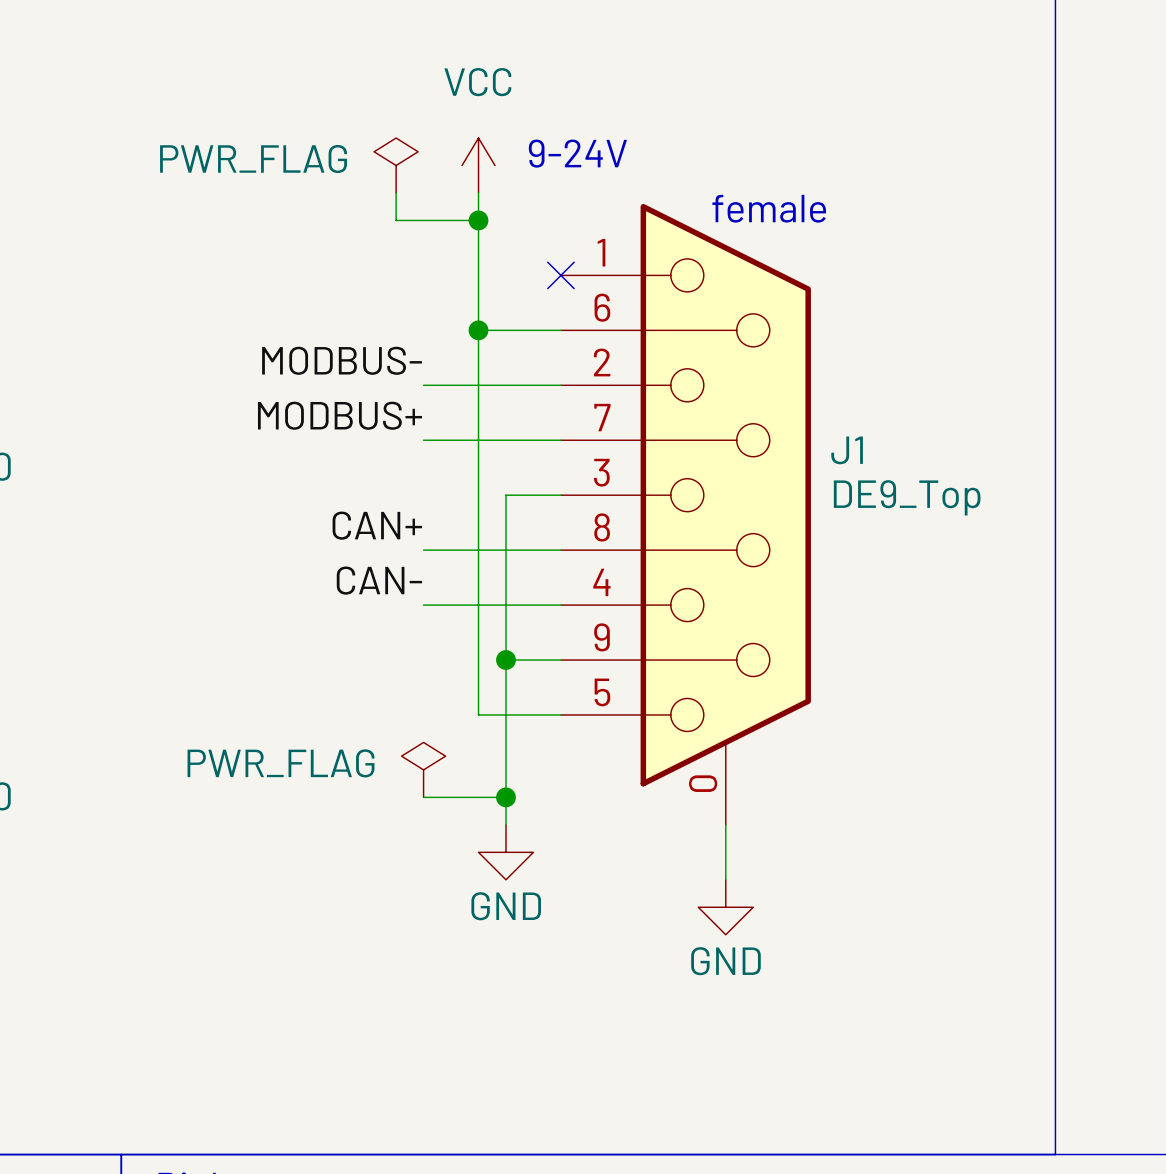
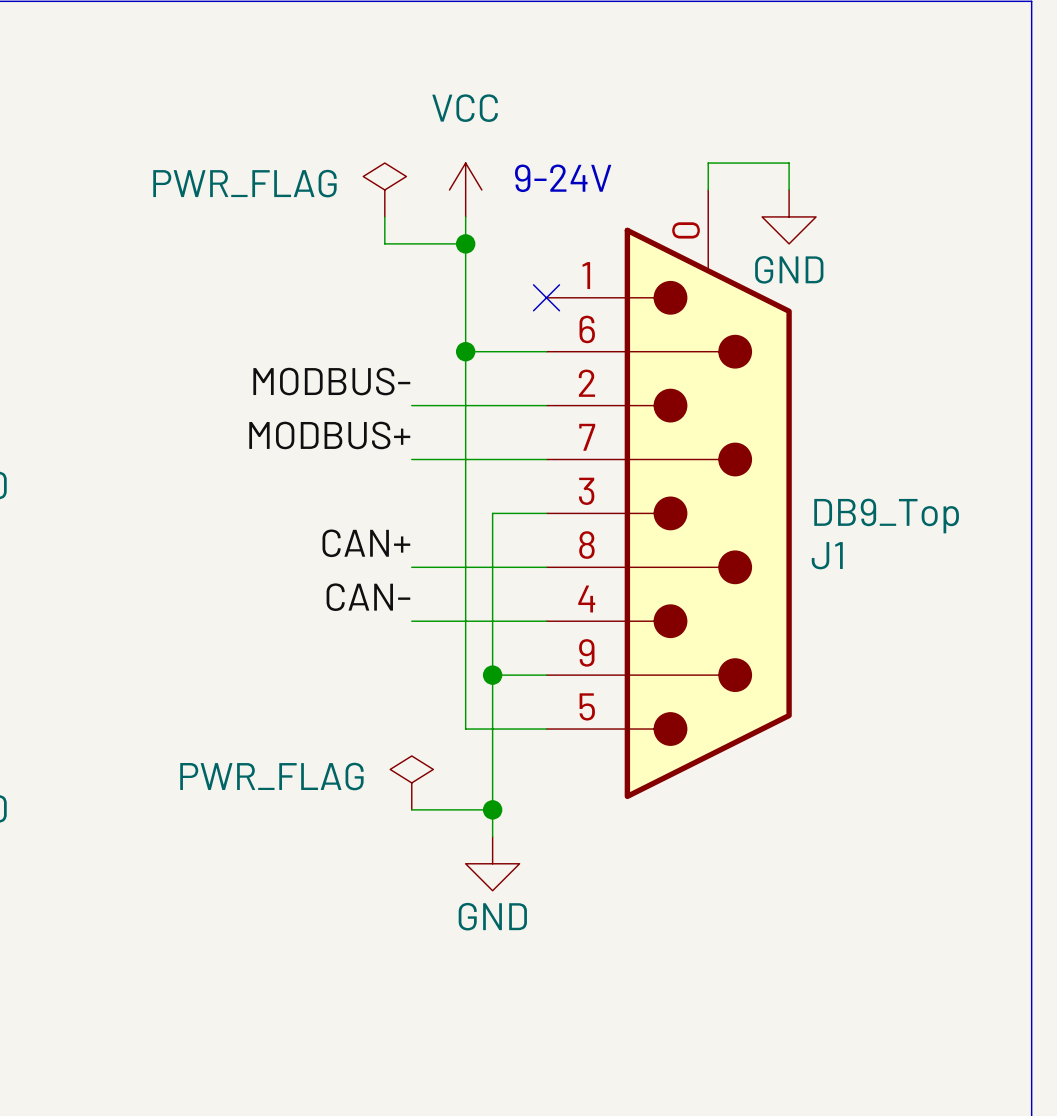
wire: none -> (708, 189) (708, 163) (789, 163) (789, 189)
power symbol: none -> GND (789, 216)
J1 symbol: [560, 203, 811, 825] -> [546, 189, 792, 800]
text: female (769, 208) -> none
J1 name position: J1 (847, 450) -> J1 (827, 555)
J1 value: DE9_Top (907, 497) -> DB9_Top (886, 516)
wire: (725, 824) (725, 879) -> none
power symbol: GND (725, 907) -> none

